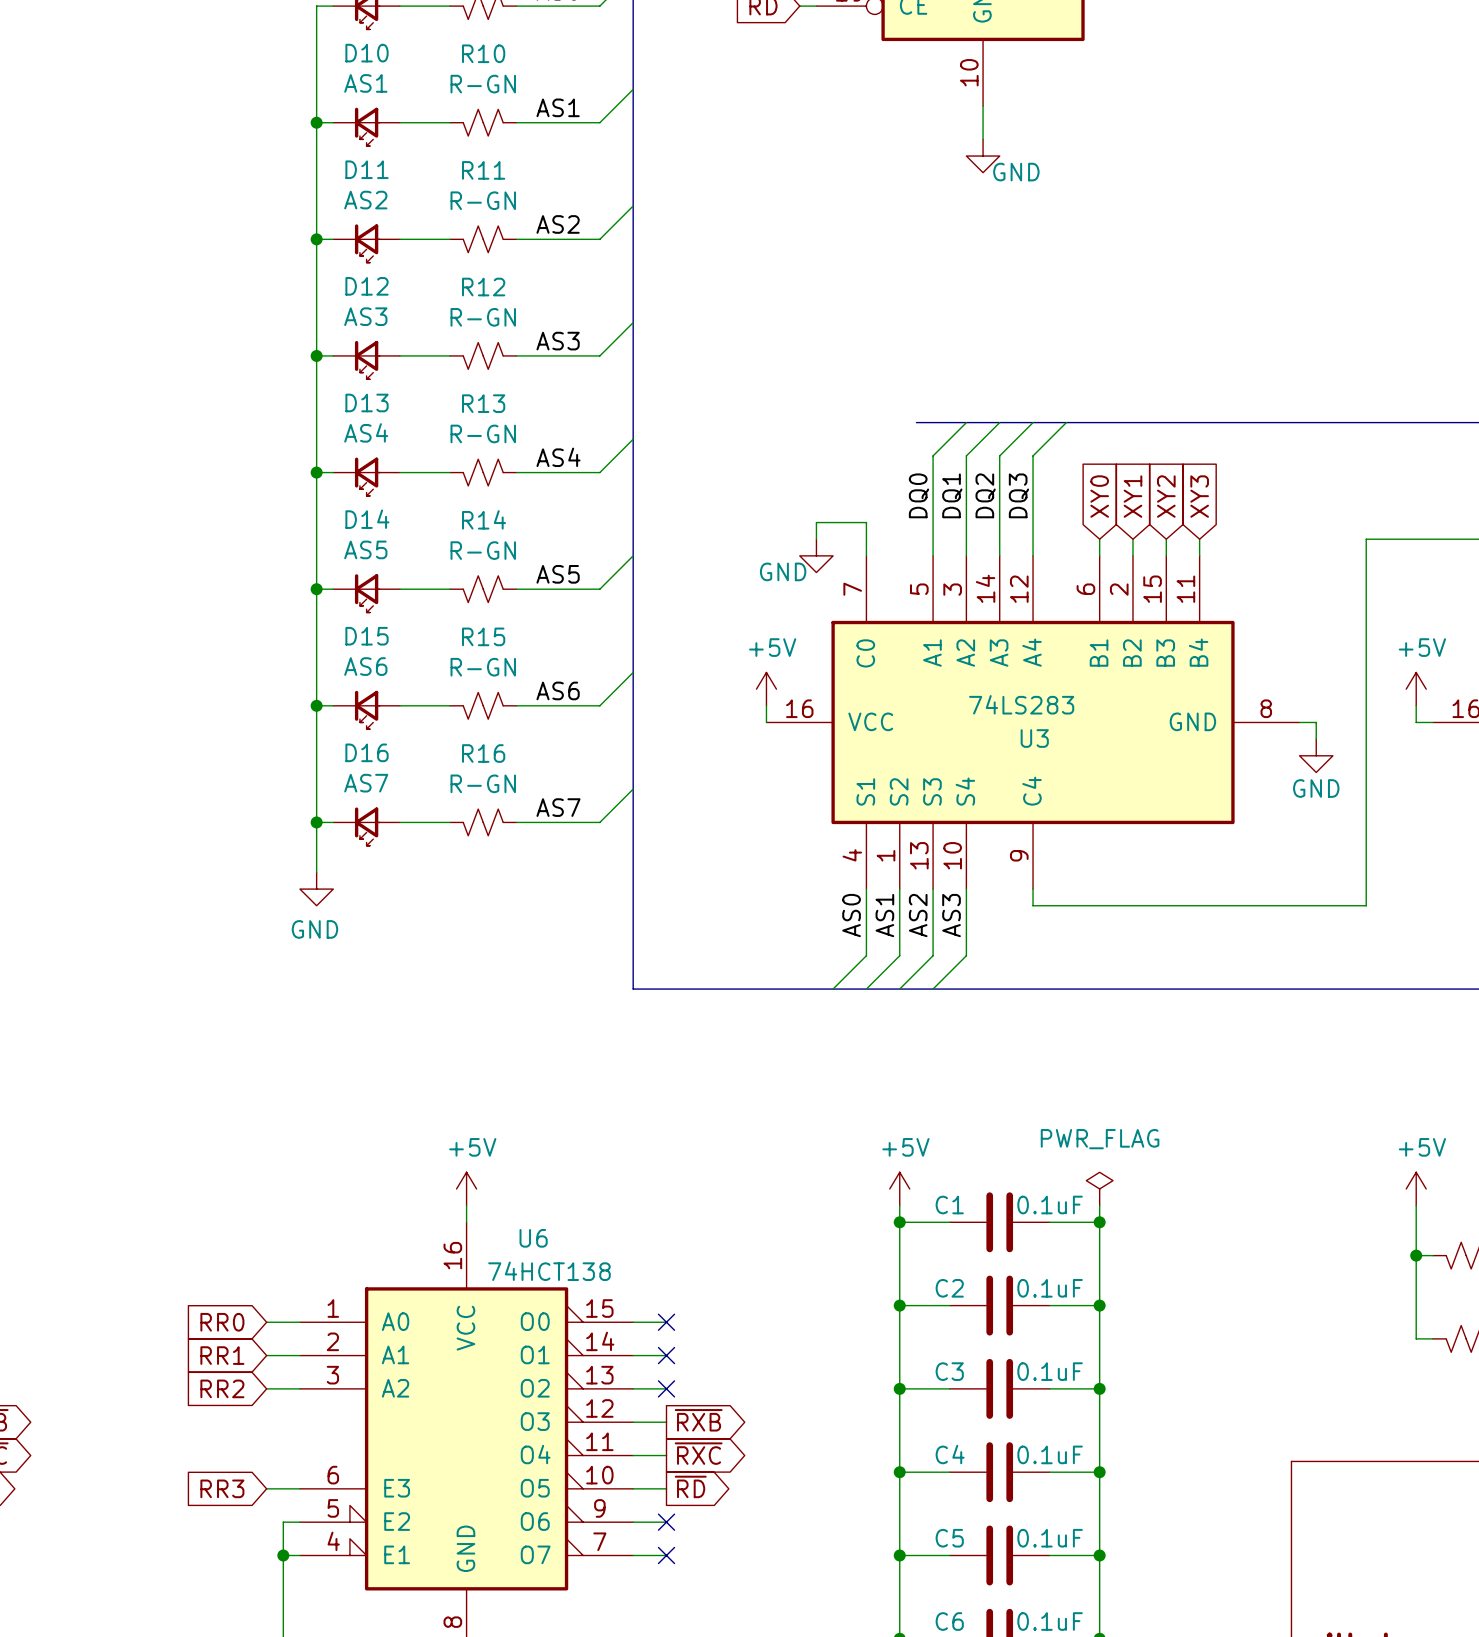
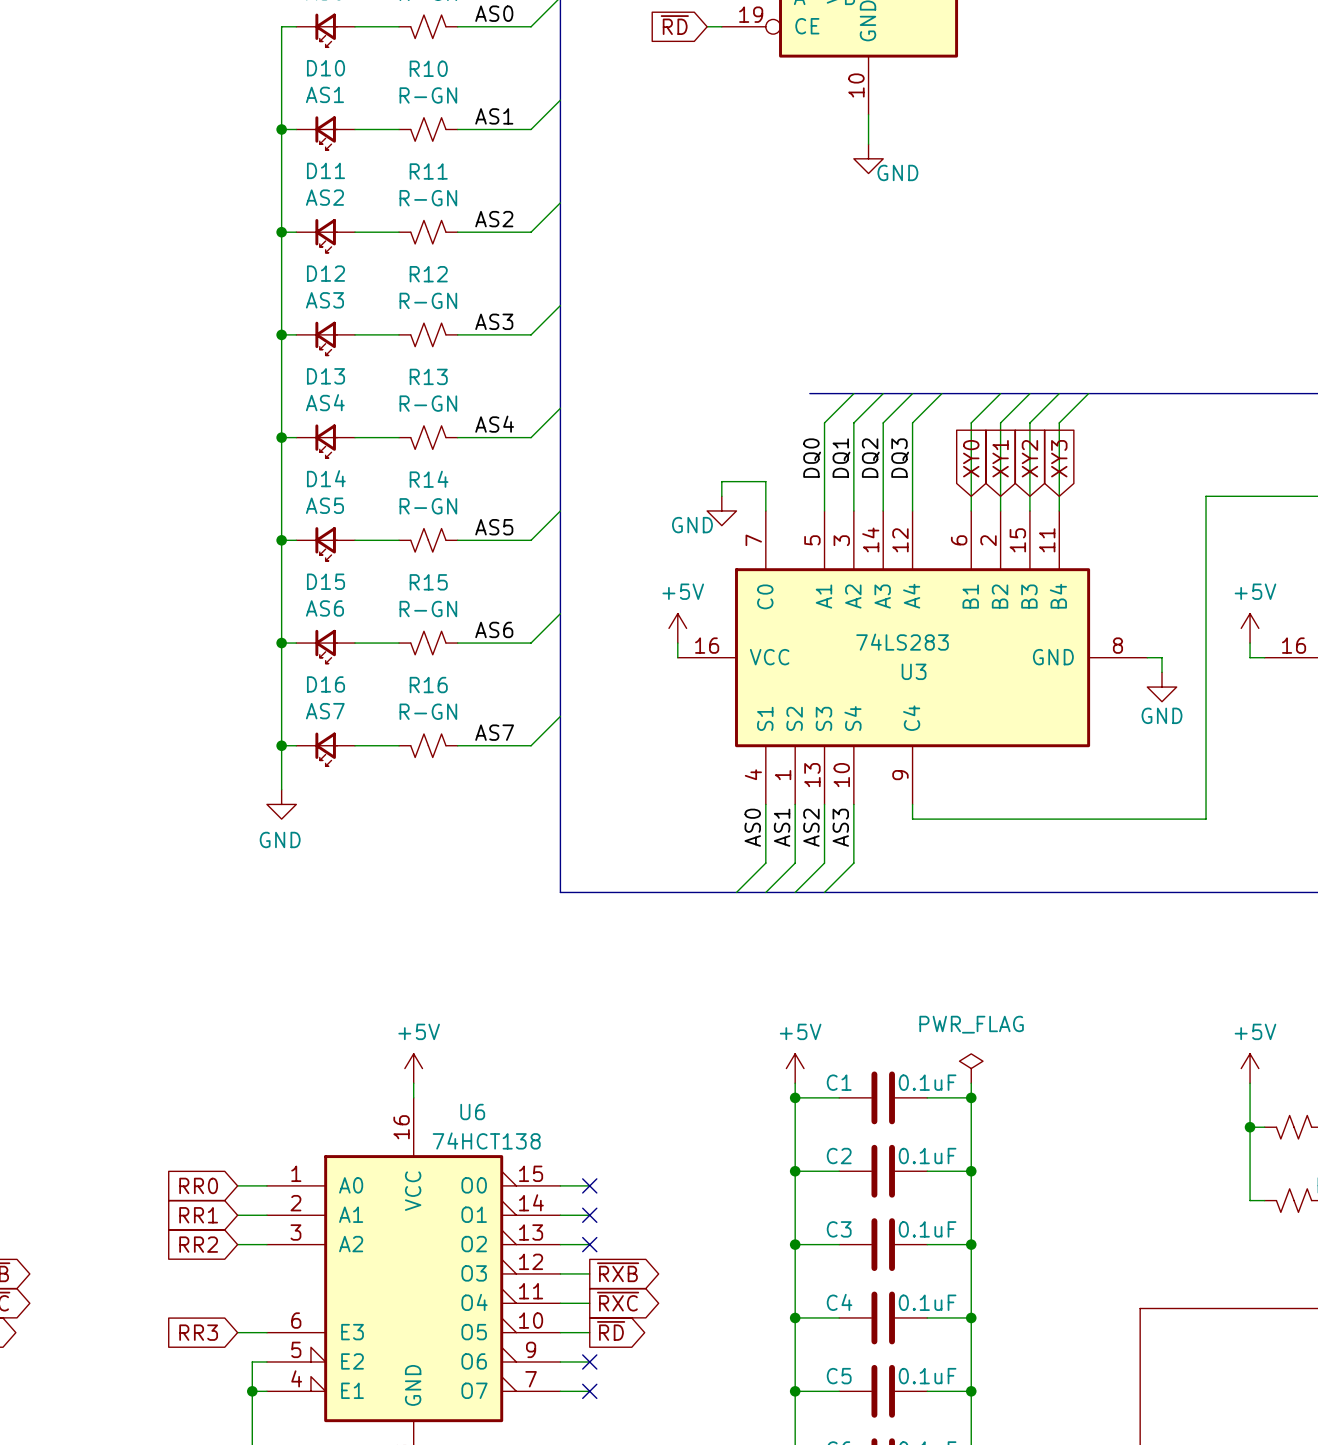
wire: none -> (1000, 393) (971, 422) (971, 496)
wire: none -> (1029, 393) (1000, 422) (1000, 496)
wire: none -> (1059, 393) (1029, 422) (1029, 496)
wire: none -> (1088, 393) (1059, 422) (1059, 496)

